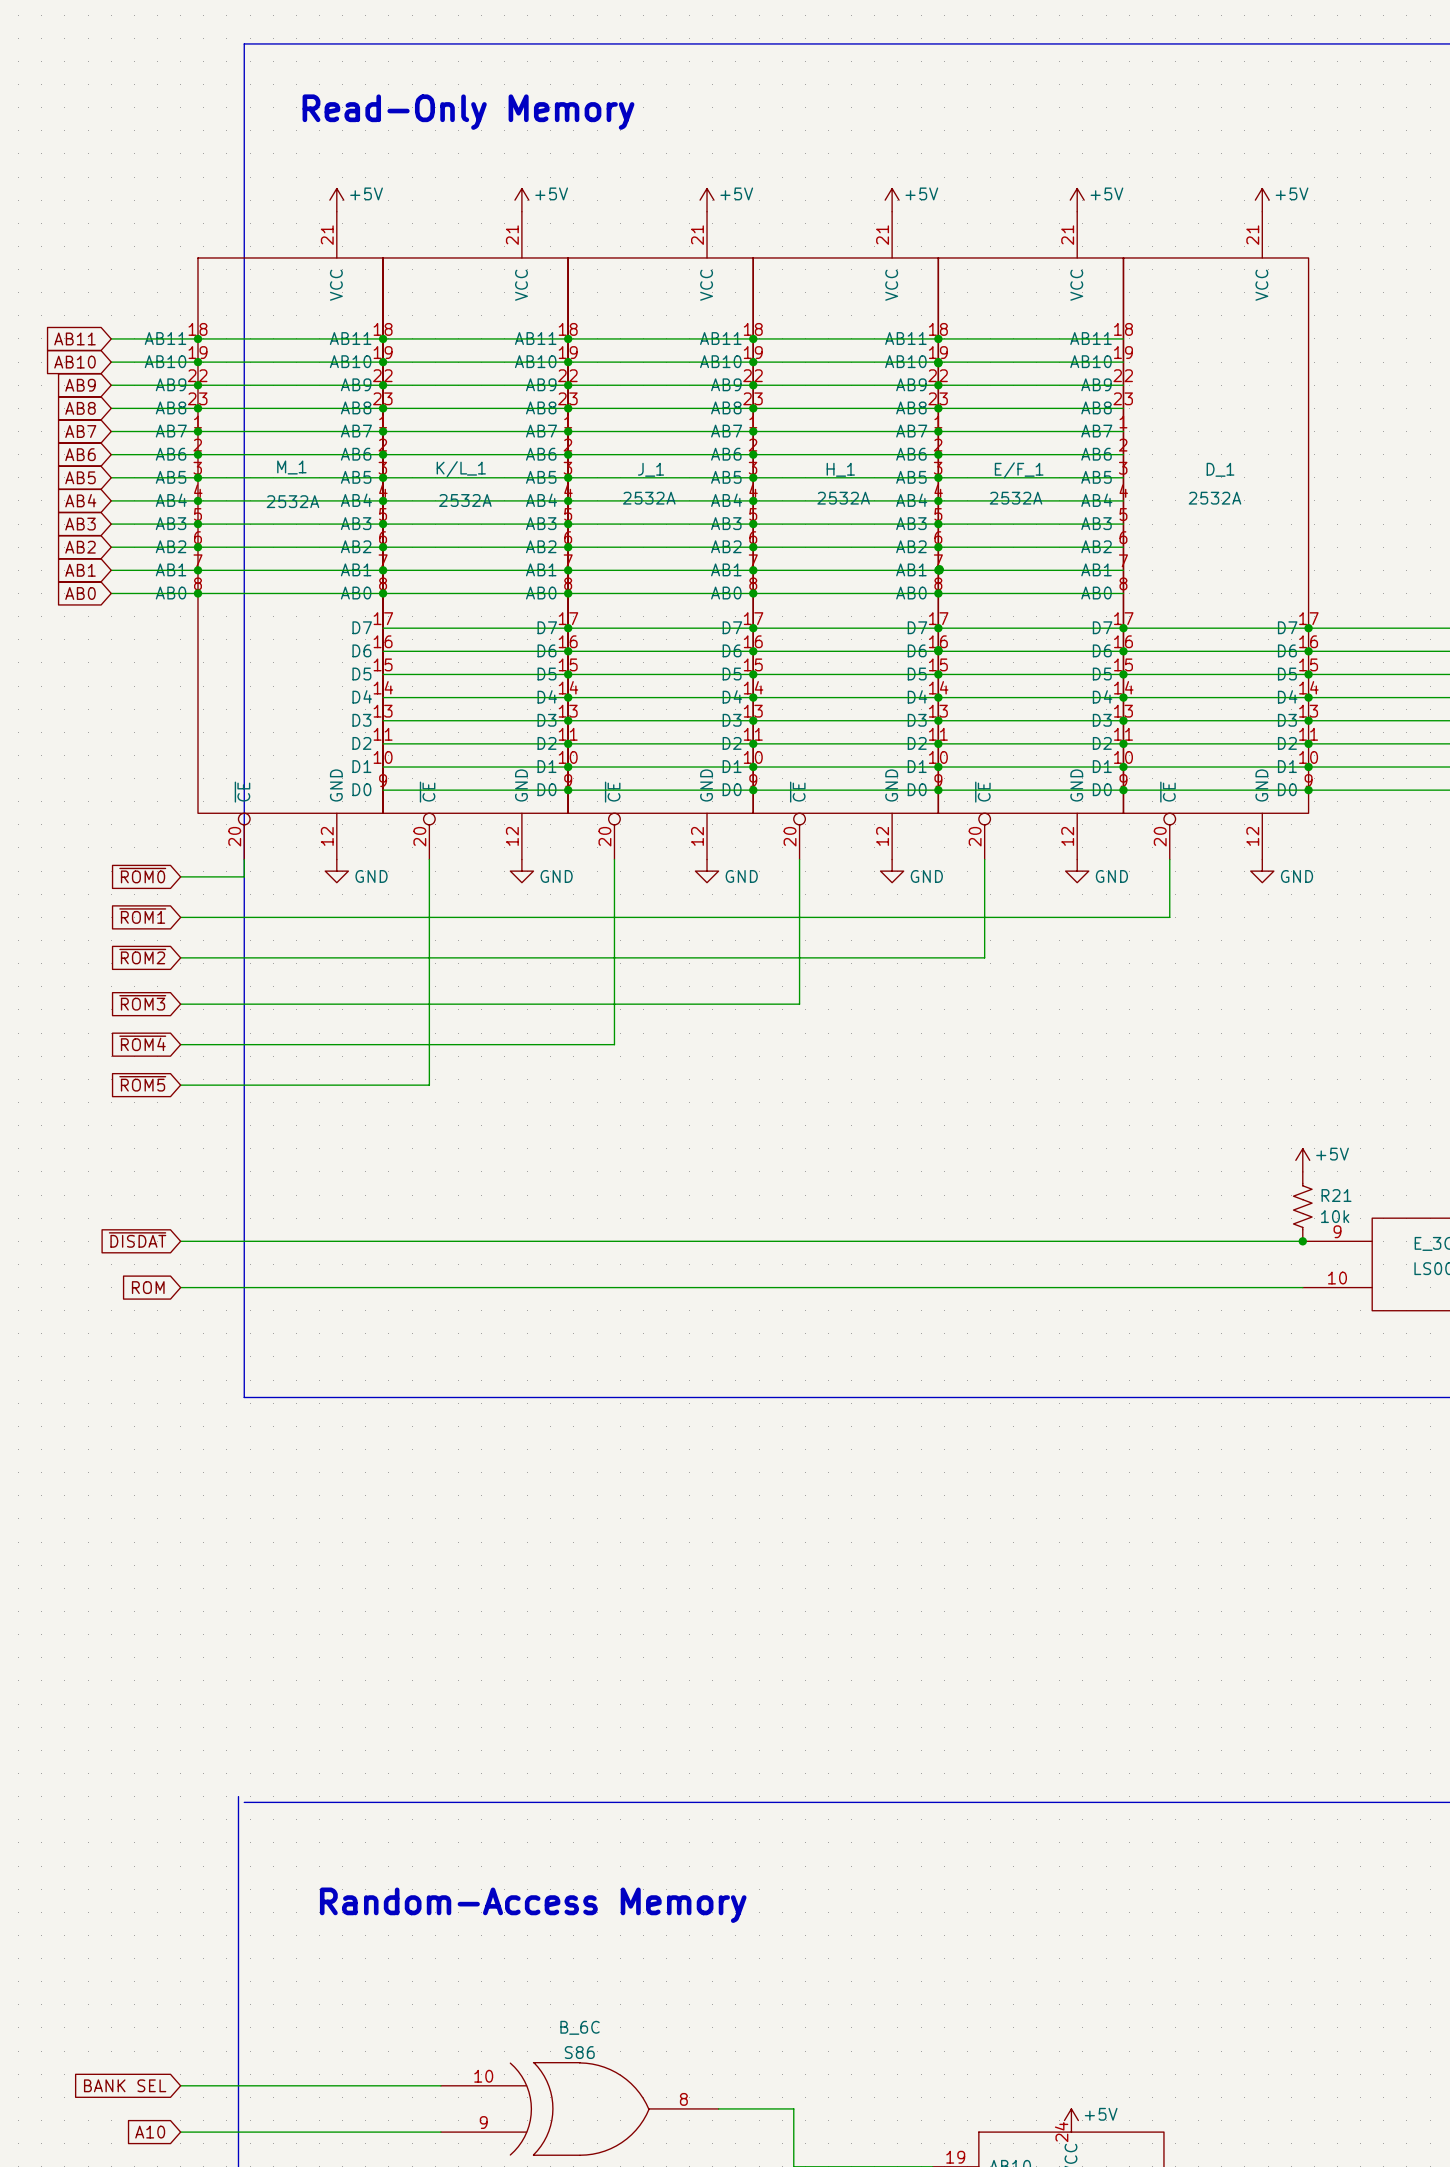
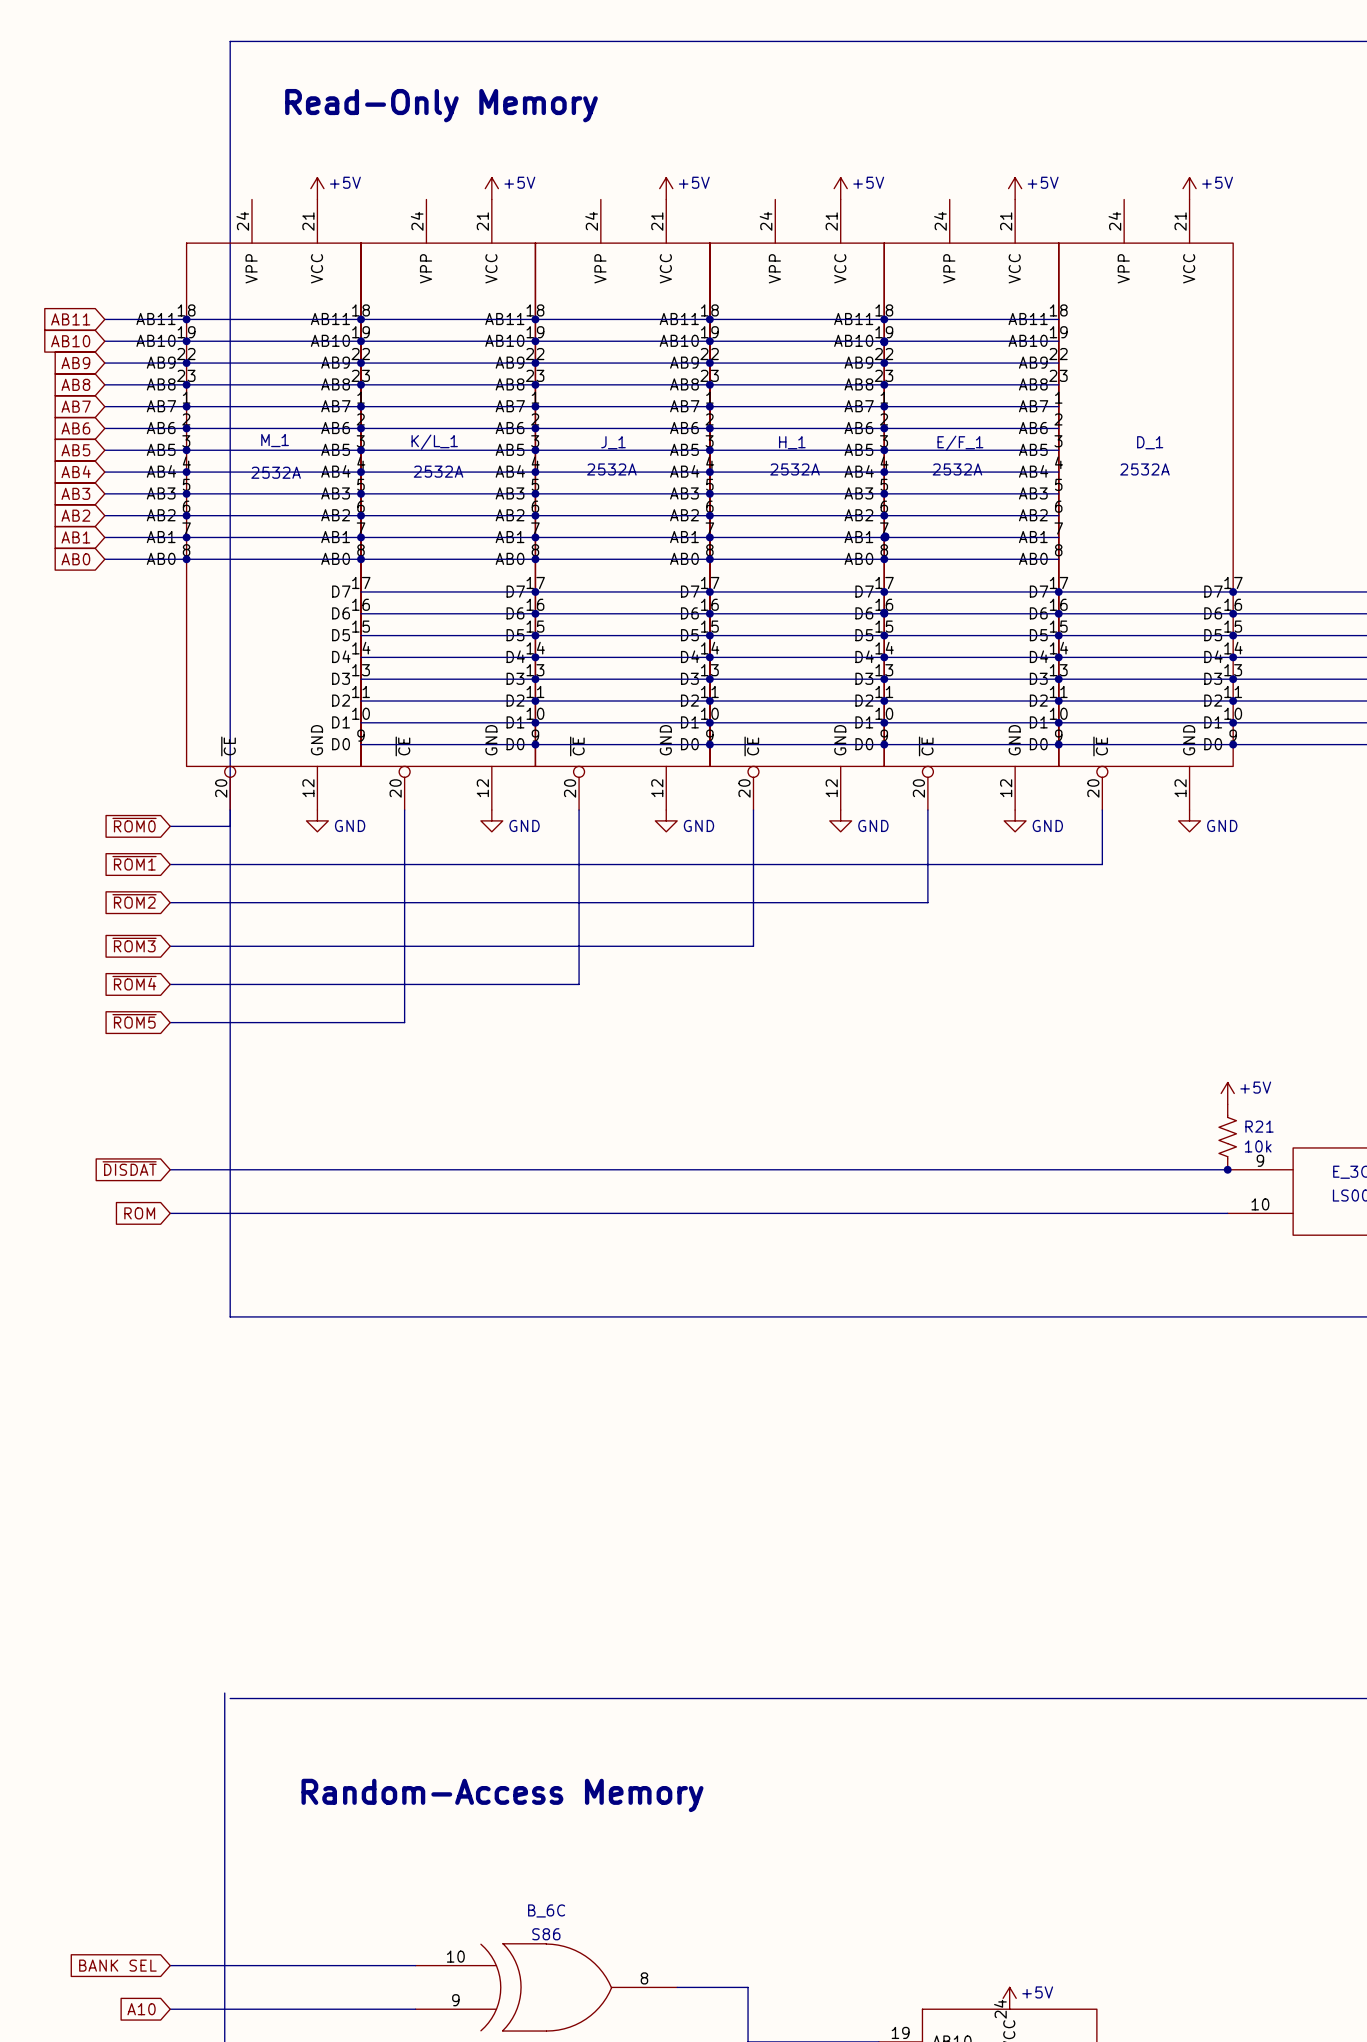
M_1 symbol: [197, 211, 384, 860] -> [186, 199, 362, 811]
K/L_1 symbol: [383, 211, 569, 860] -> [361, 199, 536, 811]
J_1 symbol: [568, 211, 754, 860] -> [535, 199, 710, 811]
H_1 symbol: [753, 211, 939, 860] -> [709, 199, 885, 811]
E/F_1 symbol: [938, 211, 1124, 860] -> [884, 199, 1059, 811]
D_1 symbol: [1123, 211, 1309, 860] -> [1058, 199, 1234, 811]

